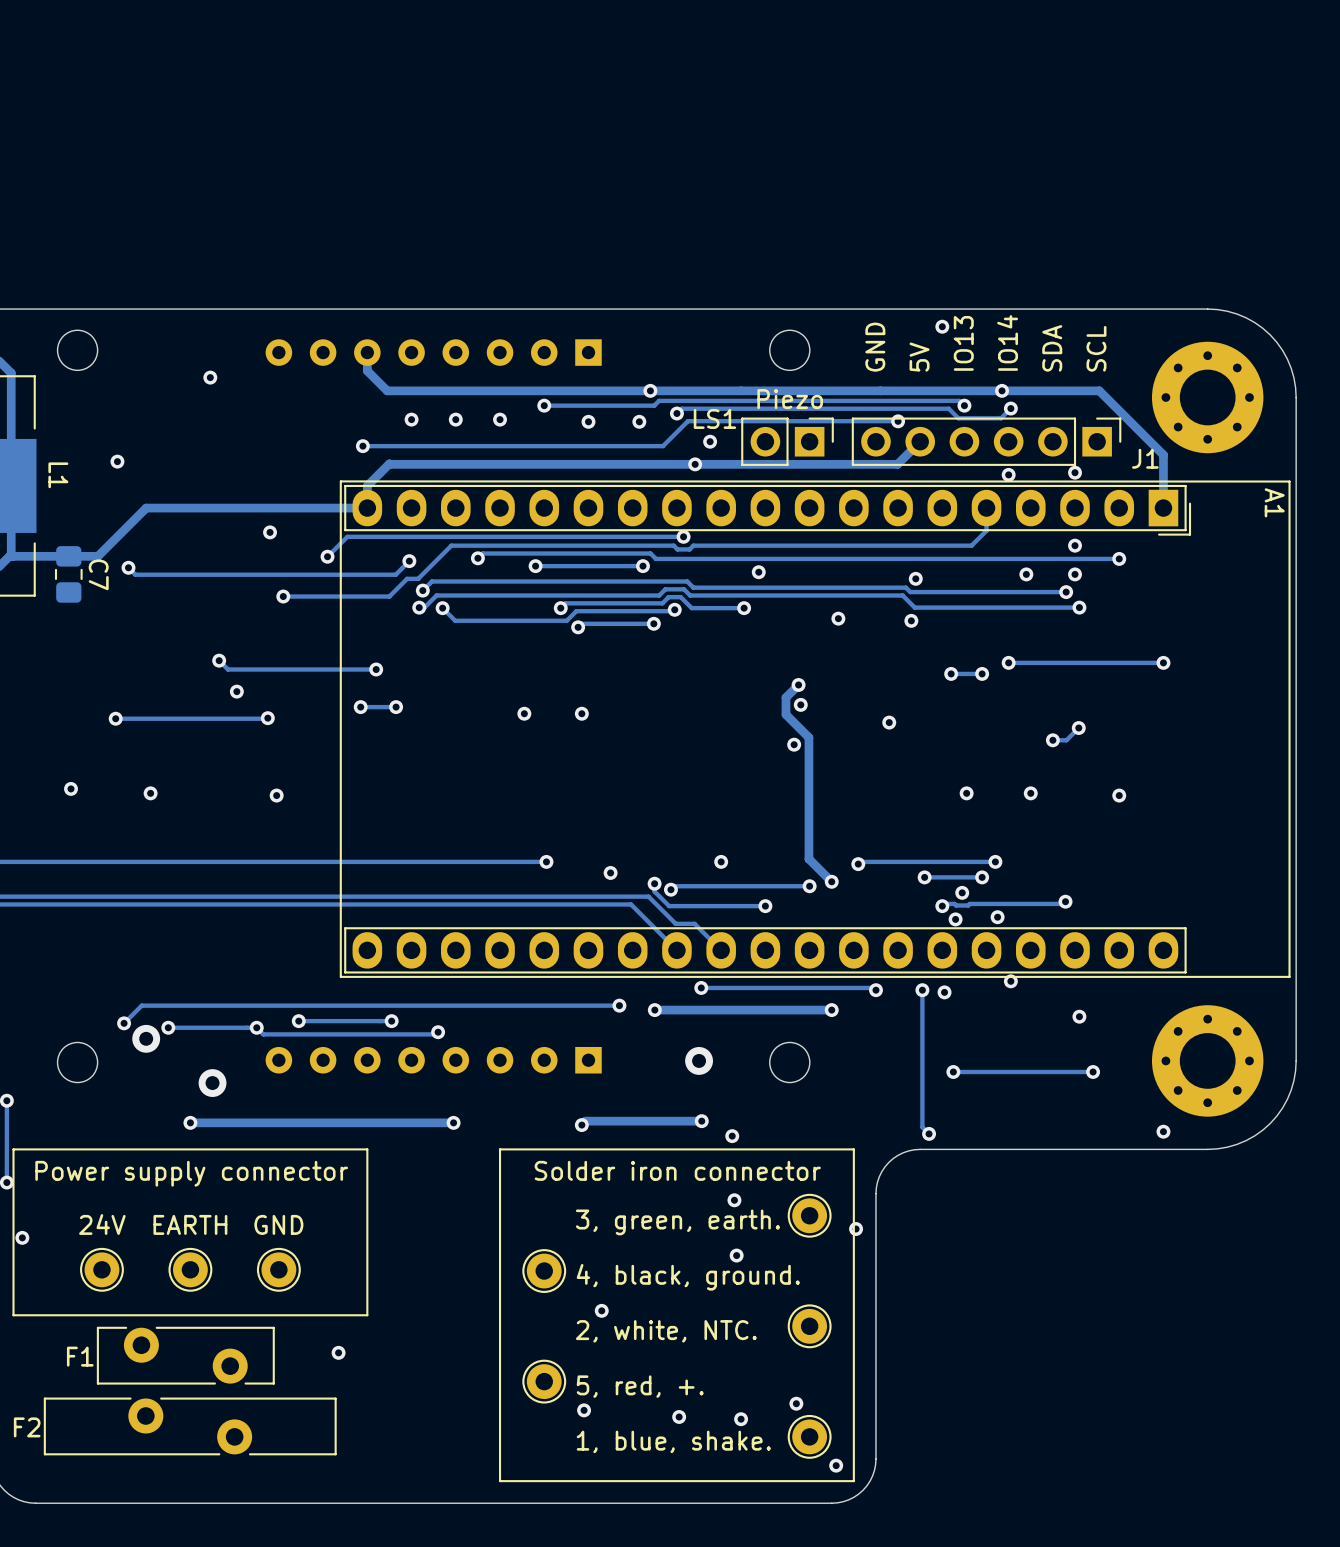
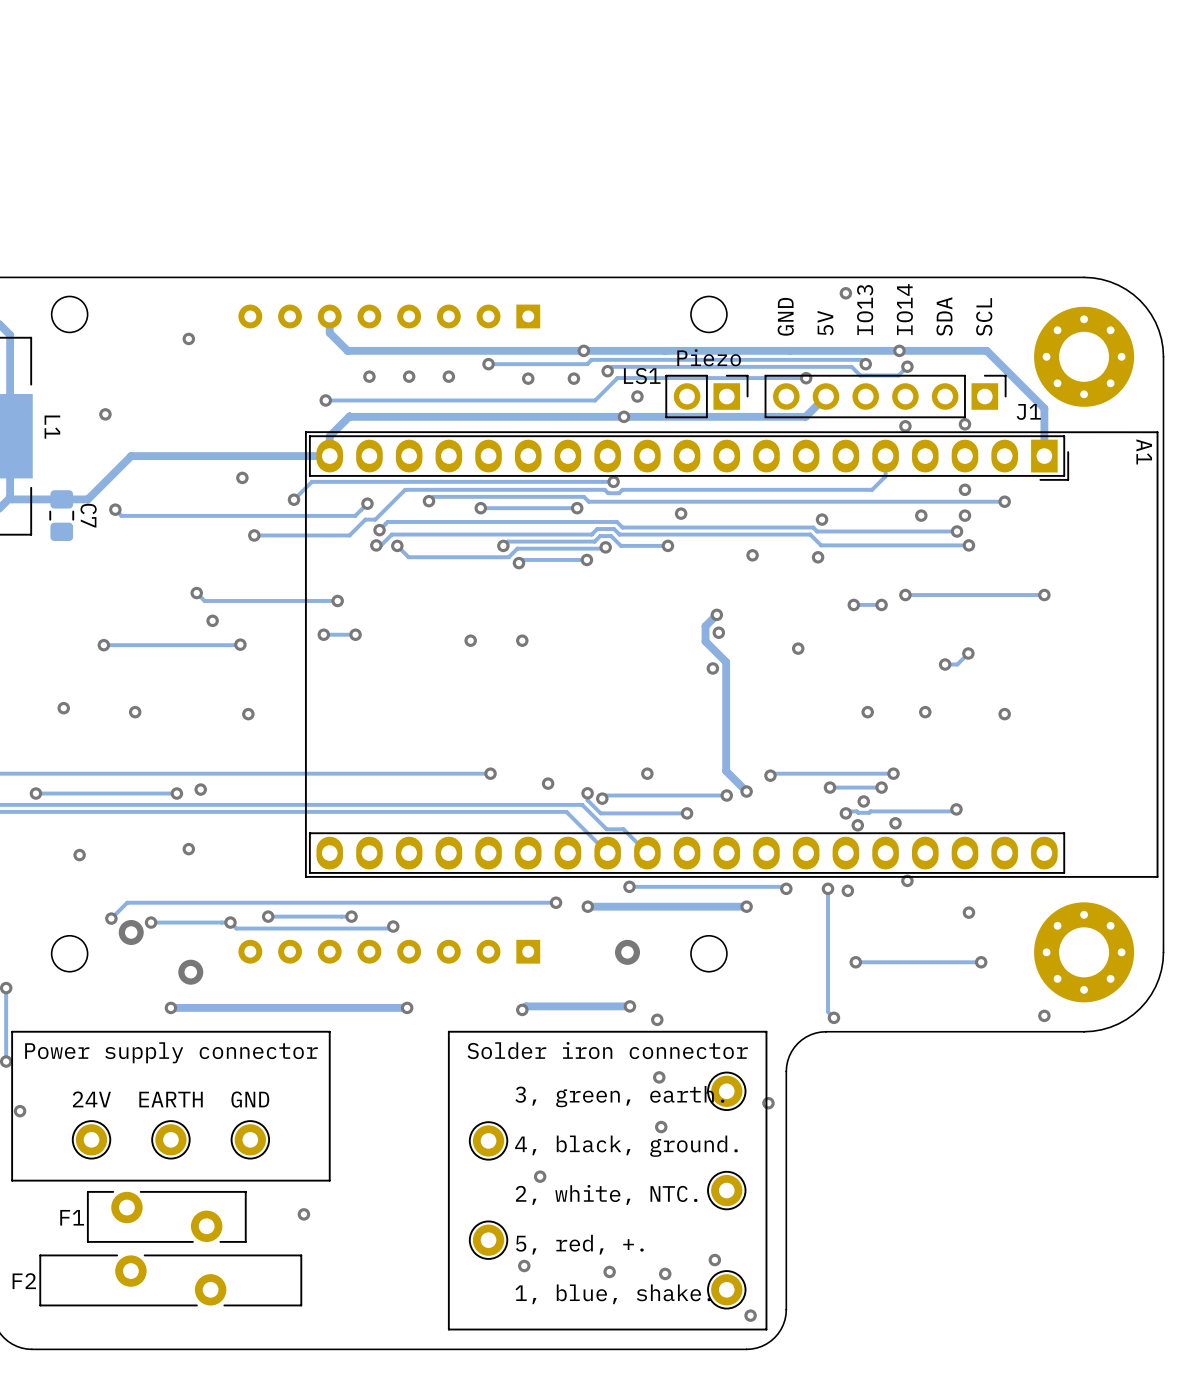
via: none -> (200, 789)
via: none -> (35, 793)
track: none -> (176, 793) (35, 793)
via: none -> (176, 793)
via: none -> (188, 849)
via: none -> (79, 855)

